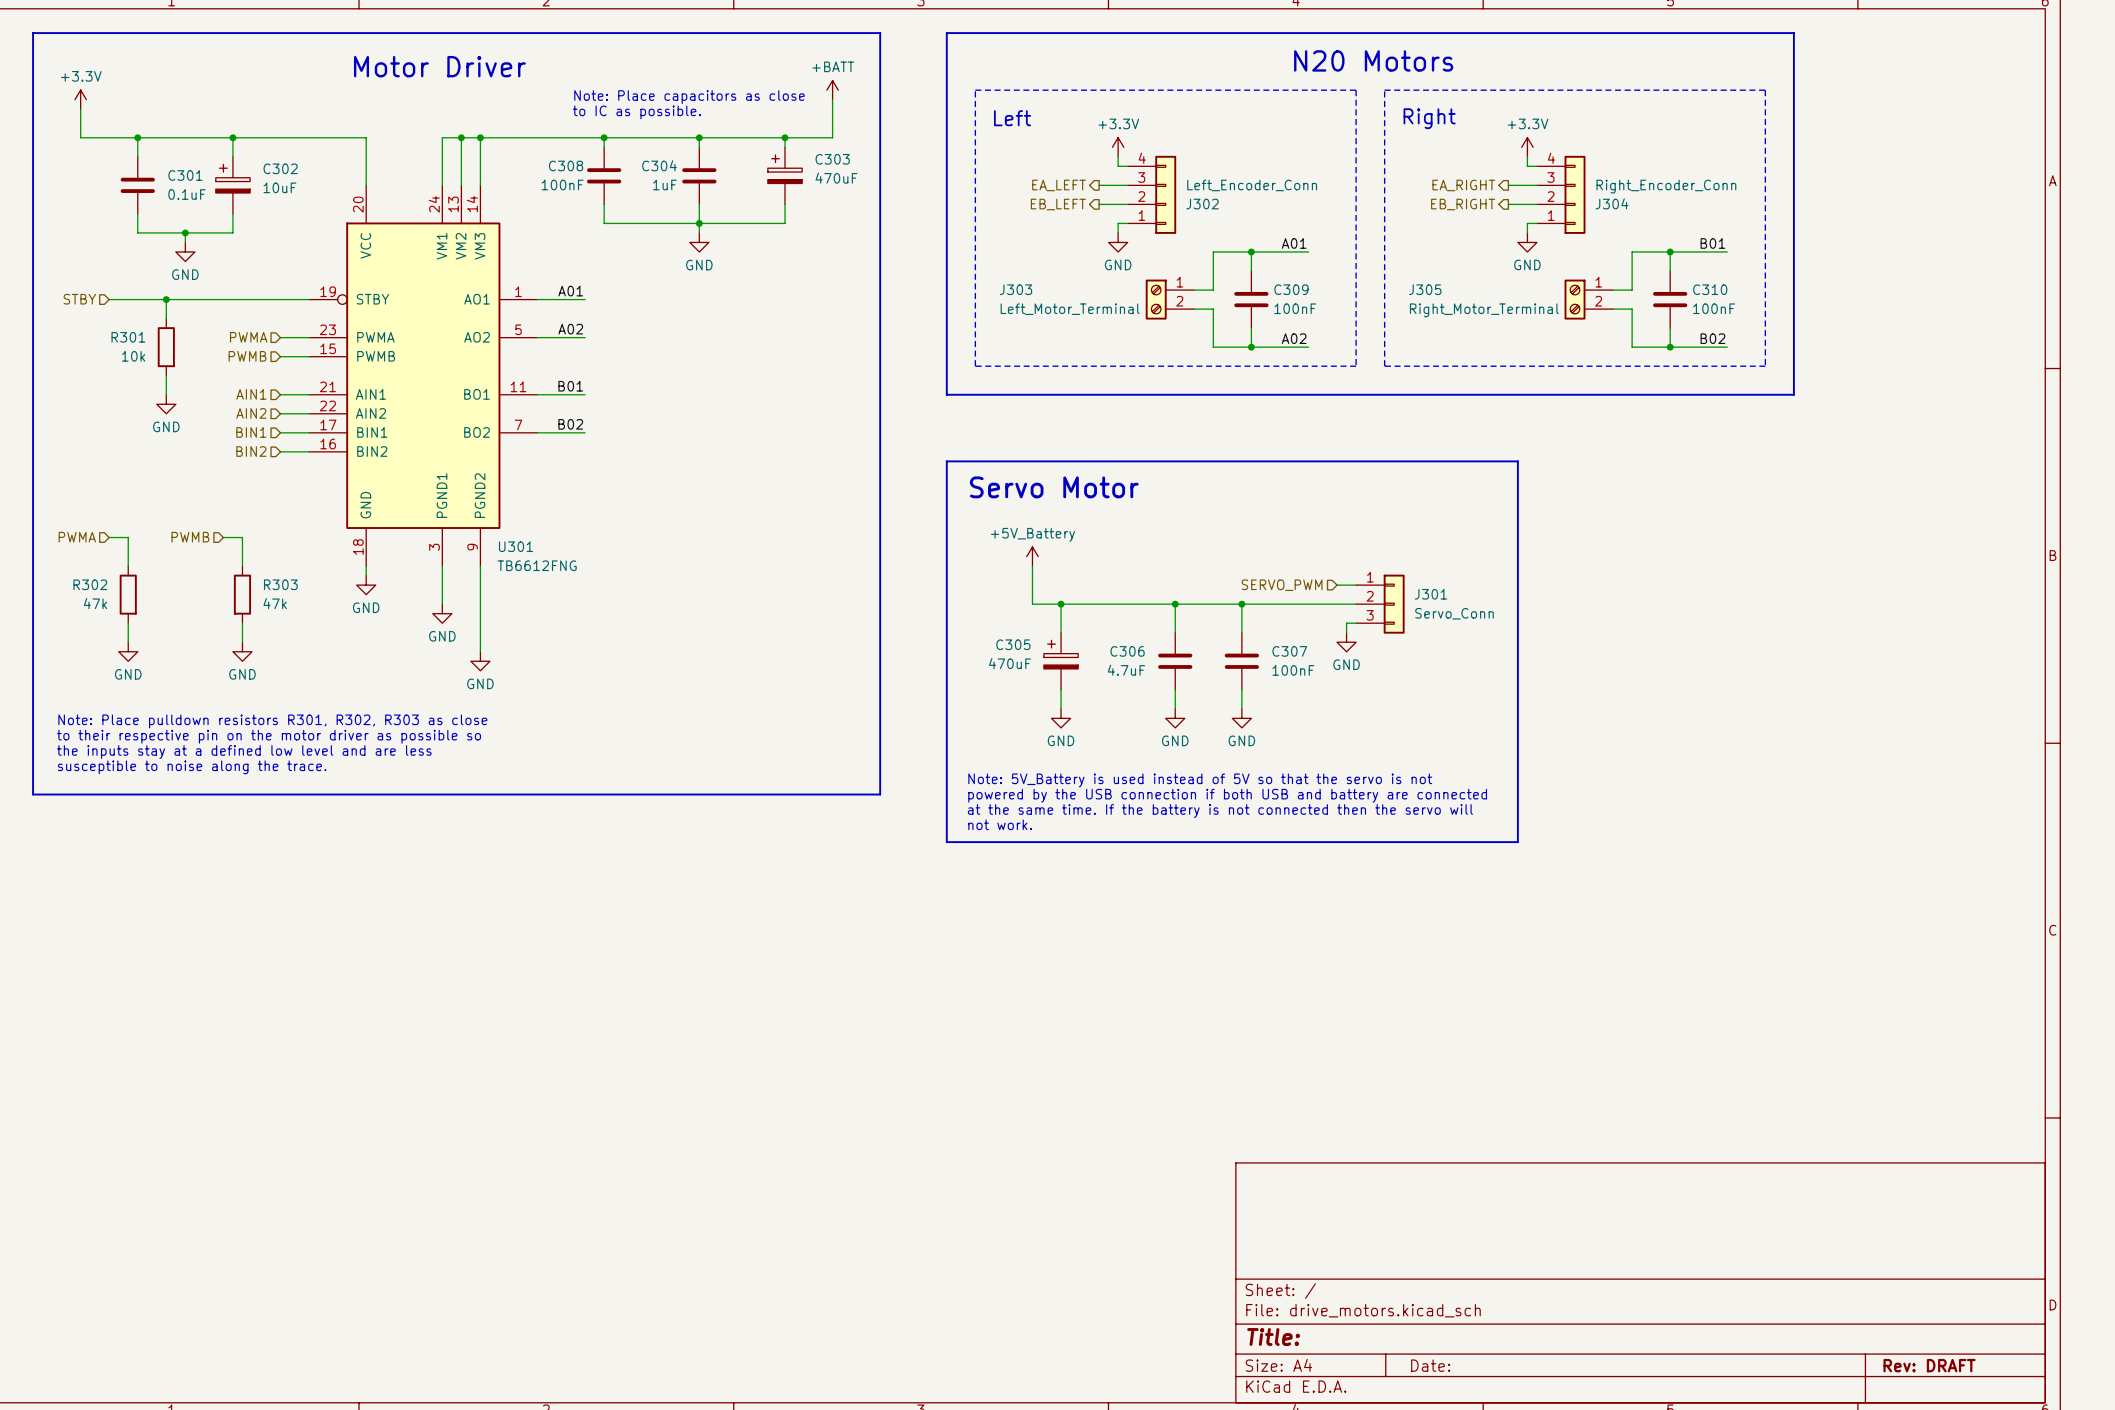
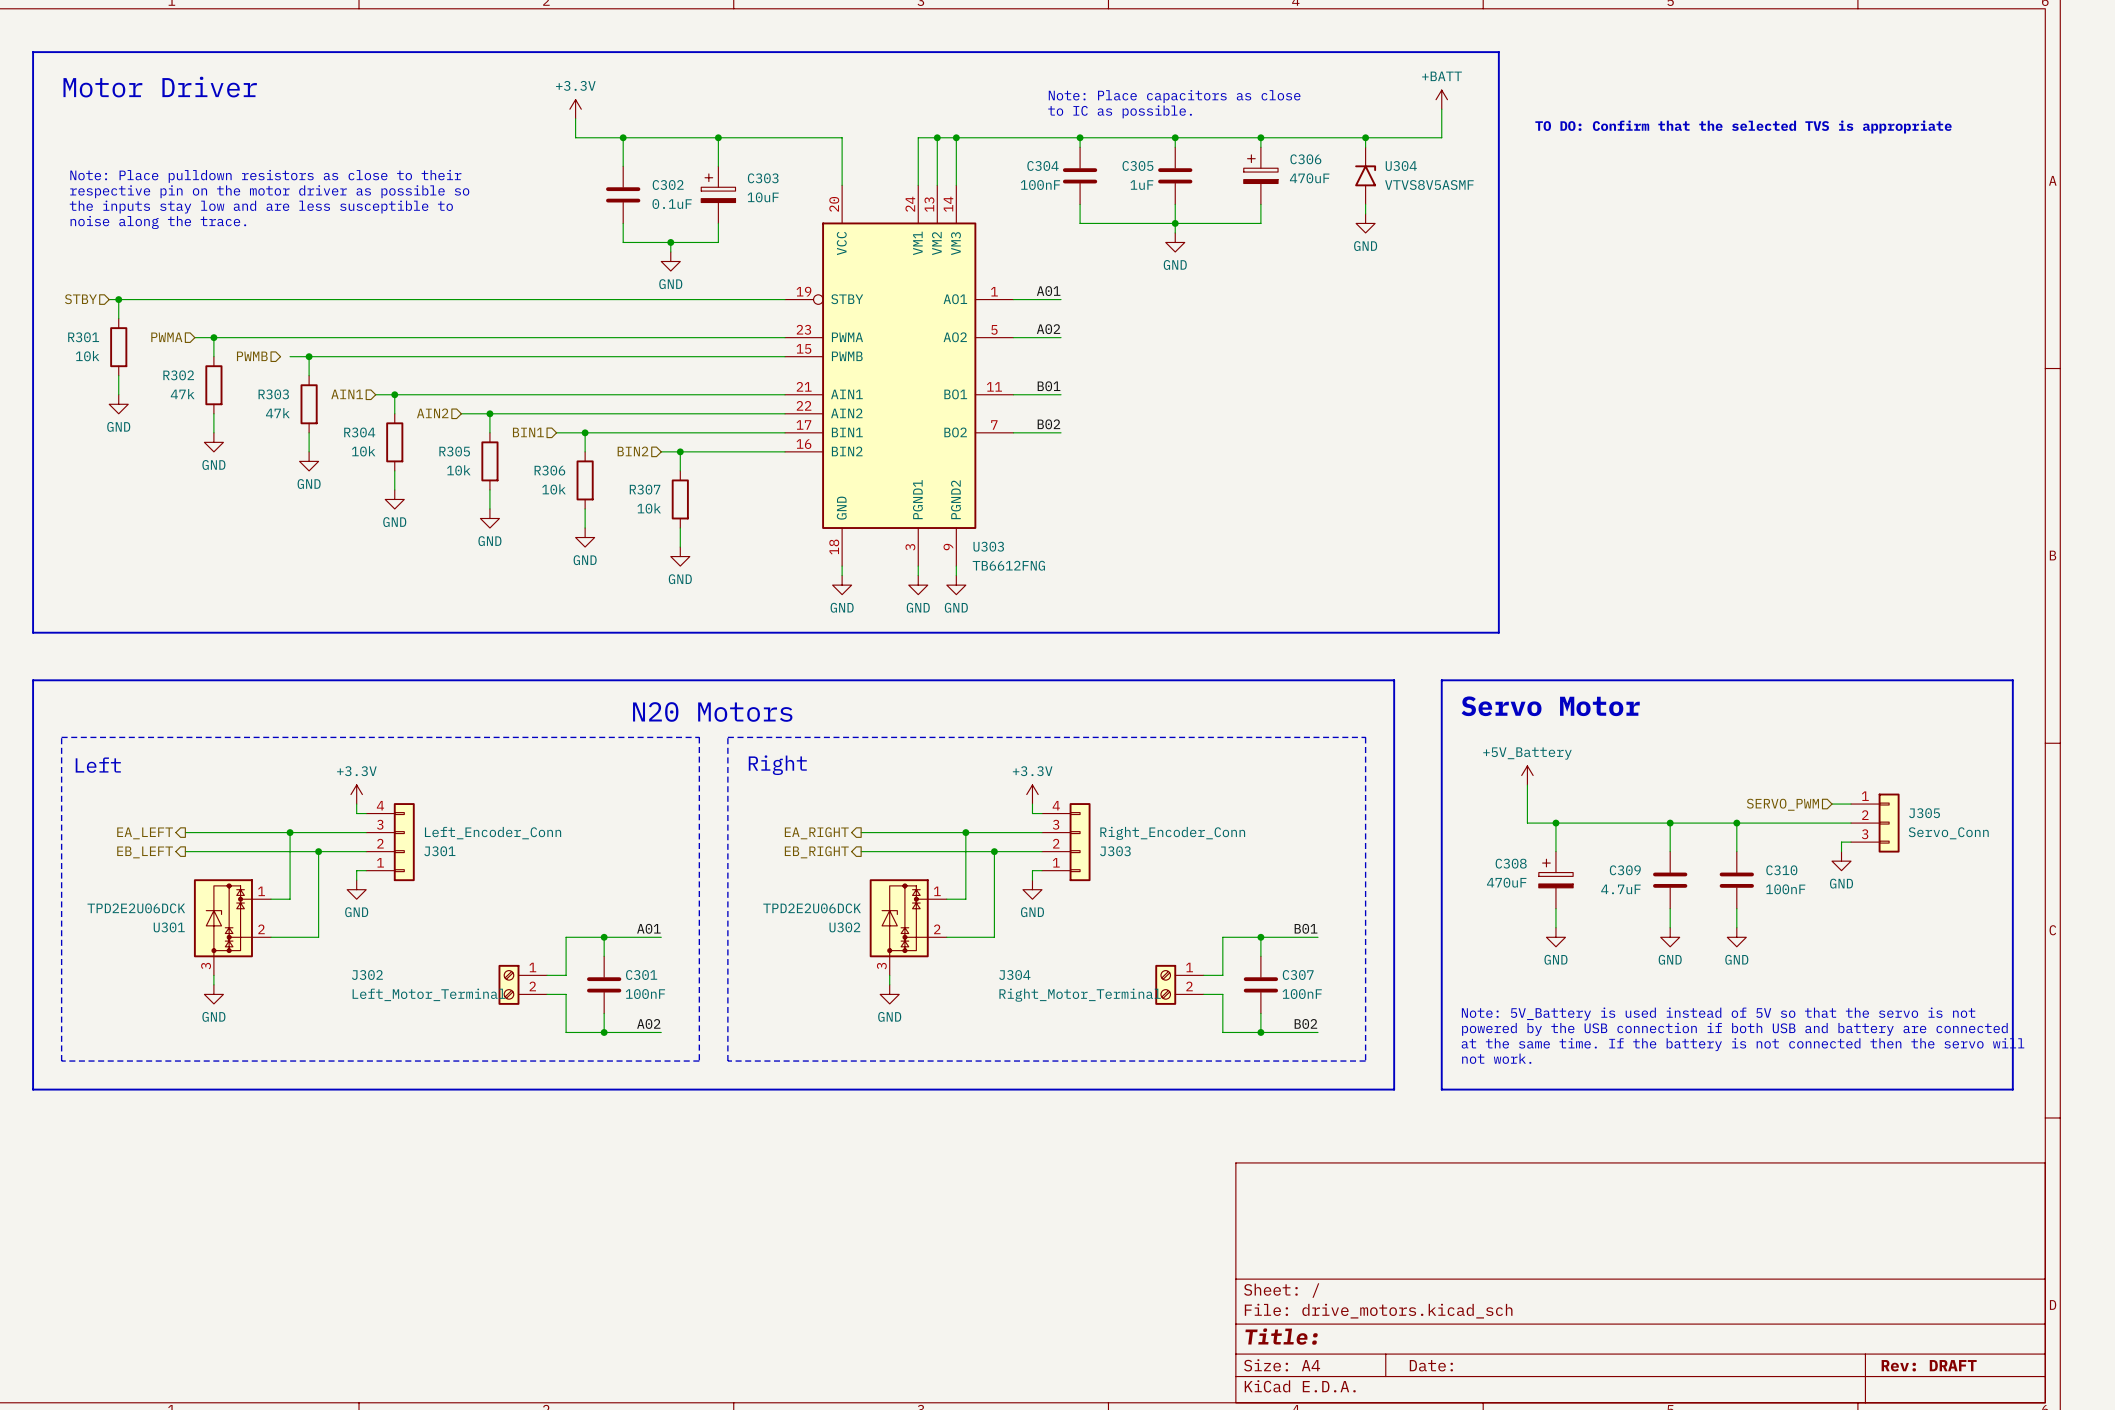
line: (946, 33) (1793, 33) (1793, 394) (946, 394) (946, 33) -> none
line: (33, 52) (33, 33) (880, 33) (880, 794) (33, 794) -> (33, 52) (1498, 52) (1498, 632) (33, 632)
text: N20 Motors (1373, 60) -> none
text: Motor Driver (439, 66) -> none
text: none -> Motor Driver (160, 87)
power symbol: +BATT (832, 90) -> none
line: (975, 90) (1356, 90) (1356, 366) (975, 366) (975, 90) -> none
line: (1384, 90) (1765, 90) (1765, 366) (1384, 366) (1384, 90) -> none
text: Note: Place capacitors as close (689, 97) -> none
text: none -> Note: Place capacitors as close (1174, 96)
power symbol: +3.3V (80, 99) -> none
wire: (832, 99) (832, 137) -> (842, 185) (842, 137) (832, 137)
power symbol: none -> +BATT (1441, 99)
wire: (80, 109) (80, 137) (366, 137) (366, 185) -> none
power symbol: none -> +3.3V (575, 109)
wire: none -> (1441, 109) (1441, 137) (918, 137) (918, 185)
text: to IC as possible. (636, 112) -> none
text: none -> to IC as possible. (1120, 111)
text: Left (1012, 118) -> none
text: Right (1429, 118) -> none
text: none -> TO DO: Confirm that the selected TVS is appropriate (1743, 127)
wire: (137, 137) (137, 156) -> none
junction: (137, 137) -> none
wire: (232, 137) (232, 156) -> none
junction: (232, 137) -> none
wire: (461, 137) (461, 185) -> none
junction: (461, 137) -> none
wire: (480, 137) (480, 185) -> none
junction: (480, 137) -> none
wire: (575, 137) (442, 137) (442, 185) -> (575, 137) (575, 118)
wire: (604, 137) (604, 147) -> none
junction position: (604, 137) -> (623, 137)
wire: none -> (623, 137) (623, 166)
wire: (699, 137) (699, 147) -> (670, 242) (670, 251)
junction position: (699, 137) -> (718, 137)
wire: (785, 137) (785, 147) -> none
junction: (785, 137) -> none
wire: none -> (937, 137) (937, 185)
junction: none -> (937, 137)
wire: none -> (956, 137) (956, 185)
junction: none -> (956, 137)
wire: none -> (1080, 137) (1080, 147)
junction: none -> (1080, 137)
wire: none -> (1175, 137) (1175, 147)
junction: none -> (1175, 137)
wire: none -> (1260, 137) (1260, 147)
junction: none -> (1260, 137)
wire: none -> (1365, 137) (1365, 147)
junction: none -> (1365, 137)
C308 symbol: [587, 147, 622, 205] -> [1538, 851, 1574, 909]
power symbol: +3.3V (1118, 147) -> none
power symbol: +3.3V (1527, 147) -> none
J302 symbol: [1127, 155, 1177, 234] -> [498, 964, 548, 1005]
J304 symbol: [1536, 155, 1586, 234] -> [1155, 964, 1204, 1005]
C302 symbol: [215, 156, 251, 214] -> [606, 166, 641, 224]
wire: (1118, 156) (1118, 166) (1127, 166) -> none
wire: (1527, 156) (1527, 166) (1536, 166) -> none
C301 name position: C301 (185, 175) -> C301 (641, 975)
C304 position: (699, 175) -> (1080, 175)
C303 position: (785, 175) -> (718, 194)
U304: none -> VTVS8V5ASMF (1365, 175)
text: none -> Note: Place pulldown resistors as close to their (265, 176)
C303 value: 470uF (836, 178) -> 10uF (763, 197)
C301 position: (137, 185) -> (604, 984)
U301 symbol: [309, 185, 538, 567] -> [193, 879, 272, 976]
C308 value: 100nF (562, 185) -> 470uF (1506, 882)
C304 value: 1uF (664, 185) -> 100nF (1040, 185)
hierarchical label: EA_LEFT (1059, 185) -> none
wire: (1099, 185) (1127, 185) -> none
J302 value: Left_Encoder_Conn (1252, 185) -> Left_Motor_Terminal (428, 994)
hierarchical label: EA_RIGHT (1463, 185) -> none
wire: (1508, 185) (1536, 185) -> none
J304 value: Right_Encoder_Conn (1666, 186) -> Right_Motor_Terminal (1080, 995)
C302 value: 10uF (279, 187) -> 0.1uF (672, 204)
text: none -> respective pin on the motor driver as possible so (269, 191)
C301 value: 0.1uF (187, 194) -> 100nF (645, 994)
J304 name position: J304 (1612, 203) -> J304 (1014, 975)
wire: (604, 204) (604, 223) (785, 223) (785, 204) -> none
wire: (699, 204) (699, 232) -> (718, 137) (718, 166)
hierarchical label: EB_LEFT (1058, 204) -> none
wire: (1099, 204) (1127, 204) -> none
J302 name position: J302 (1202, 204) -> J302 (367, 975)
wire: none -> (1260, 204) (1260, 223) (1127, 223)
wire: none -> (1365, 204) (1365, 213)
hierarchical label: EB_RIGHT (1463, 204) -> none
wire: (1508, 204) (1536, 204) -> none
text: none -> the inputs stay low and are less susceptible to (261, 207)
wire: (137, 213) (137, 232) (232, 232) (232, 213) -> none
text: none -> noise along the trace. (158, 222)
wire: none -> (623, 223) (623, 242) (718, 242) (718, 223)
junction position: (699, 223) -> (670, 242)
wire: (1118, 223) (1118, 232) -> (1118, 223) (1080, 223) (1080, 204)
junction: none -> (1175, 223)
power symbol: none -> GND (1365, 223)
wire: (1536, 223) (1527, 223) (1527, 232) -> none
wire: (185, 232) (185, 242) -> none
junction: (185, 232) -> none
power symbol position: GND (699, 242) -> GND (670, 261)
power symbol position: GND (1118, 242) -> GND (1175, 242)
power symbol: GND (1527, 242) -> none
label: A01 (1294, 243) -> none
label: B01 (1712, 243) -> none
power symbol: GND (185, 251) -> none
wire: (1251, 251) (1251, 271) -> none
junction: (1251, 251) -> none
wire: (1308, 251) (1213, 251) (1213, 290) (1194, 290) -> none
wire: (1670, 251) (1670, 271) -> none
junction: (1670, 251) -> none
wire: (1727, 251) (1632, 251) (1632, 290) (1613, 290) -> none
J303 symbol: [1145, 279, 1195, 320] -> [1041, 803, 1091, 882]
J305 symbol: [1564, 279, 1614, 320] -> [1851, 793, 1900, 853]
J303 name position: J303 (1015, 289) -> J303 (1115, 851)
C309 name position: C309 (1291, 289) -> C309 (1625, 870)
J305 name position: J305 (1425, 289) -> J305 (1924, 813)
C310 name position: C310 (1710, 289) -> C310 (1781, 870)
label: A01 (570, 291) -> none
label: none -> A01 (1048, 291)
junction: none -> (118, 299)
wire: (166, 299) (166, 318) -> (118, 299) (118, 318)
junction: (166, 299) -> none
wire: none -> (585, 299) (785, 299)
wire: none -> (1013, 299) (1061, 299)
C309 position: (1251, 299) -> (1670, 880)
C310 position: (1670, 299) -> (1736, 880)
C309 value: 100nF (1295, 308) -> 4.7uF (1620, 889)
C310 value position: 100nF (1714, 308) -> 100nF (1785, 889)
J303 value: Left_Motor_Terminal (1070, 309) -> Right_Encoder_Conn (1172, 833)
wire: (1194, 309) (1213, 309) (1213, 347) (1308, 347) -> none
wire: (1613, 309) (1632, 309) (1632, 347) (1727, 347) -> none
J305 value: Right_Motor_Terminal (1484, 310) -> Servo_Conn (1948, 833)
wire: (1251, 328) (1251, 347) -> none
wire: (1670, 328) (1670, 347) -> none
label: A02 (570, 329) -> none
label: none -> A02 (1048, 329)
wire: none -> (194, 337) (280, 337)
wire: none -> (213, 337) (213, 356)
junction: none -> (213, 337)
hierarchical label position: PWMA (248, 337) -> PWMA (166, 337)
wire: none -> (585, 337) (785, 337)
wire: none -> (1013, 337) (1061, 337)
label: A02 (1294, 338) -> none
label: B02 (1712, 338) -> none
R301 position: (166, 347) -> (118, 347)
junction: (1251, 347) -> none
junction: (1670, 347) -> none
wire: (280, 356) (290, 356) -> none
junction: none -> (309, 356)
wire: none -> (785, 356) (309, 356) (309, 375)
wire: (166, 375) (166, 394) -> (118, 375) (118, 394)
U303: none -> TB6612FNG (899, 375)
label: B01 (570, 386) -> none
label: none -> B01 (1049, 386)
hierarchical label position: AIN1 (251, 394) -> AIN1 (347, 394)
wire: (280, 394) (309, 394) -> none
junction: none -> (394, 394)
wire: none -> (585, 394) (785, 394)
power symbol: none -> GND (118, 404)
power symbol: GND (166, 404) -> none
wire: none -> (213, 413) (213, 432)
hierarchical label position: AIN2 (251, 413) -> AIN2 (432, 413)
wire: (280, 413) (309, 413) -> none
wire: none -> (461, 413) (785, 413)
junction: none -> (489, 413)
label: B02 (570, 424) -> none
label: none -> B02 (1048, 424)
hierarchical label: BIN1 (251, 432) -> none
wire: (280, 432) (309, 432) -> (309, 451) (309, 432)
hierarchical label: none -> BIN1 (528, 432)
wire: (537, 432) (556, 432) -> none
junction: none -> (585, 432)
wire: none -> (785, 432) (585, 432) (585, 451)
wire: none -> (1013, 432) (1061, 432)
power symbol: none -> GND (213, 442)
R304: none -> 10k (394, 442)
hierarchical label: BIN2 (251, 451) -> none
wire: (280, 451) (309, 451) -> none
hierarchical label: none -> BIN2 (632, 451)
wire: none -> (661, 451) (785, 451)
wire: none -> (680, 451) (680, 470)
junction: none -> (680, 451)
power symbol: none -> GND (309, 461)
R305: none -> 10k (489, 461)
line: (946, 461) (946, 842) (1517, 842) (1517, 461) (946, 461) -> none
R306: none -> 10k (585, 480)
text: Servo Motor (1054, 487) -> none
power symbol: none -> GND (394, 499)
R307: none -> 10k (680, 499)
wire: none -> (585, 508) (585, 528)
power symbol: none -> GND (489, 518)
wire: none -> (680, 528) (680, 547)
hierarchical label: PWMA (77, 537) -> none
wire: (109, 537) (128, 537) (128, 566) -> none
hierarchical label: PWMB (190, 537) -> none
wire: (223, 537) (242, 537) (242, 566) -> none
power symbol: none -> GND (585, 537)
U301 name position: U301 (516, 546) -> U301 (169, 927)
power symbol: none -> GND (680, 556)
power symbol: +5V_Battery (1032, 556) -> none
U301 value: TB6612FNG (537, 565) -> TPD2E2U06DCK (136, 908)
wire: (366, 566) (366, 575) -> none
wire: (442, 566) (442, 604) -> none
wire: (480, 566) (480, 651) -> none
wire: none -> (842, 566) (842, 575)
wire: none -> (918, 566) (918, 575)
wire: none -> (956, 566) (956, 575)
wire: (1032, 566) (1032, 604) (1356, 604) -> none
J301 symbol: [1356, 574, 1405, 634] -> [366, 803, 415, 882]
R303 name position: R303 (280, 584) -> R303 (273, 394)
power symbol: GND (366, 585) -> none
power symbol: none -> GND (842, 585)
power symbol: none -> GND (918, 585)
power symbol: none -> GND (956, 585)
hierarchical label: SERVO_PWM (1282, 585) -> none
wire: (1337, 585) (1356, 585) -> none
R302 position: (128, 594) -> (213, 385)
R303 position: (242, 594) -> (309, 404)
J301 name position: J301 (1430, 594) -> J301 (439, 851)
R303 value position: 47k (275, 603) -> 47k (277, 413)
wire: (1061, 604) (1061, 632) -> none
junction: (1061, 604) -> none
wire: (1175, 604) (1175, 632) -> none
junction: (1175, 604) -> none
wire: (1241, 604) (1241, 632) -> none
junction: (1241, 604) -> none
power symbol: GND (442, 613) -> none
J301 value: Servo_Conn (1454, 613) -> Left_Encoder_Conn (493, 833)
wire: (128, 623) (128, 642) -> none
wire: (242, 623) (242, 642) -> none
wire: (1356, 623) (1346, 623) (1346, 632) -> none
line: (33, 632) (33, 680) -> (33, 794) (33, 1089) (1394, 1089) (1394, 680) (33, 680)
C305 symbol: [1043, 632, 1079, 690] -> [1158, 147, 1193, 205]
C306 symbol: [1158, 632, 1193, 690] -> [1243, 147, 1279, 205]
power symbol: GND (1346, 642) -> none
power symbol: GND (128, 651) -> none
power symbol: GND (242, 651) -> none
C306 name position: C306 (1127, 651) -> C306 (1305, 159)
C307 name position: C307 (1289, 651) -> C307 (1298, 975)
power symbol: GND (480, 661) -> none
C307 position: (1241, 661) -> (1260, 984)
C305 value: 470uF (1009, 663) -> 1uF (1141, 185)
C306 value: 4.7uF (1126, 670) -> 470uF (1309, 178)
C307 value position: 100nF (1293, 670) -> 100nF (1302, 994)
line: none -> (1441, 680) (2012, 680) (2012, 1089) (1441, 1089) (1441, 680)
wire: (1061, 689) (1061, 708) -> none
wire: (1175, 689) (1175, 708) -> none
wire: (1241, 689) (1241, 708) -> none
text: none -> Servo Motor (1550, 706)
text: none -> N20 Motors (712, 711)
power symbol: GND (1061, 718) -> none
power symbol: GND (1175, 718) -> none
power symbol: GND (1241, 718) -> none
text: Note: Place pulldown resistors R301, R302, R303 as close (272, 721) -> none
text: to their respective pin on the motor driver as possible so (269, 736) -> none
line: none -> (61, 737) (699, 737) (699, 1061) (61, 1061) (61, 737)
line: none -> (727, 737) (1365, 737) (1365, 1061) (727, 1061) (727, 737)
text: the inputs stay at a defined low level and are less (244, 752) -> none
text: none -> Left (98, 765)
text: none -> Right (777, 765)
text: susceptible to noise along the trace. (192, 767) -> none
power symbol: none -> +5V_Battery (1527, 775)
text: Note: 5V_Battery is used instead of 5V so that the servo is not (1200, 780) -> none
wire: none -> (1527, 785) (1527, 823) (1851, 823)
power symbol: none -> +3.3V (356, 794)
power symbol: none -> +3.3V (1032, 794)
text: powered by the USB connection if both USB and battery are connected (1227, 795) -> none
wire: none -> (356, 804) (356, 813) (366, 813)
wire: none -> (1032, 804) (1032, 813) (1041, 813)
hierarchical label: none -> SERVO_PWM (1782, 804)
wire: none -> (1831, 804) (1851, 804)
text: at the same time. If the battery is not connected then the servo will (1220, 811) -> none
wire: none -> (1555, 823) (1555, 851)
junction: none -> (1555, 823)
wire: none -> (1670, 823) (1670, 851)
junction: none -> (1670, 823)
wire: none -> (1736, 823) (1736, 851)
junction: none -> (1736, 823)
text: not work. (1000, 824) -> none
hierarchical label: none -> EA_LEFT (145, 833)
wire: none -> (185, 832) (366, 832)
wire: none -> (290, 832) (290, 899) (271, 899)
junction: none -> (290, 832)
hierarchical label: none -> EA_RIGHT (816, 833)
wire: none -> (861, 832) (1041, 832)
wire: none -> (965, 832) (965, 899) (946, 899)
junction: none -> (965, 832)
wire: none -> (1851, 842) (1841, 842) (1841, 851)
hierarchical label: none -> EB_LEFT (145, 852)
wire: none -> (185, 851) (366, 851)
wire: none -> (318, 851) (318, 937) (271, 937)
junction: none -> (318, 851)
hierarchical label: none -> EB_RIGHT (816, 852)
wire: none -> (861, 851) (1041, 851)
wire: none -> (994, 851) (994, 937) (946, 937)
junction: none -> (994, 851)
power symbol: none -> GND (1841, 861)
wire: none -> (366, 870) (356, 870) (356, 880)
wire: none -> (1041, 870) (1032, 870) (1032, 880)
power symbol: none -> GND (356, 889)
power symbol: none -> GND (1032, 889)
wire: none -> (1555, 908) (1555, 927)
wire: none -> (1670, 908) (1670, 927)
wire: none -> (1736, 908) (1736, 927)
U302: none -> TPD2E2U06DCK (908, 927)
label: none -> A01 (648, 928)
label: none -> B01 (1306, 928)
wire: none -> (604, 937) (604, 956)
junction: none -> (604, 937)
wire: none -> (661, 937) (566, 937) (566, 975) (547, 975)
wire: none -> (1260, 937) (1260, 956)
junction: none -> (1260, 937)
wire: none -> (1318, 937) (1222, 937) (1222, 975) (1203, 975)
power symbol: none -> GND (1555, 937)
power symbol: none -> GND (1670, 937)
power symbol: none -> GND (1736, 937)
wire: none -> (213, 975) (213, 984)
wire: none -> (889, 975) (889, 984)
power symbol: none -> GND (213, 994)
wire: none -> (547, 994) (566, 994) (566, 1032) (661, 1032)
power symbol: none -> GND (889, 994)
wire: none -> (1203, 994) (1222, 994) (1222, 1032) (1318, 1032)
wire: none -> (604, 1013) (604, 1032)
wire: none -> (1260, 1013) (1260, 1032)
text: none -> Note: 5V_Battery is used instead of 5V so that the servo is not (1718, 1013)
label: none -> A02 (648, 1023)
label: none -> B02 (1305, 1023)
text: none -> powered by the USB connection if both USB and battery are connected (1734, 1029)
junction: none -> (604, 1032)
junction: none -> (1260, 1032)
text: none -> at the same time. If the battery is not connected then the servo will (1742, 1044)
text: none -> not work. (1496, 1058)

